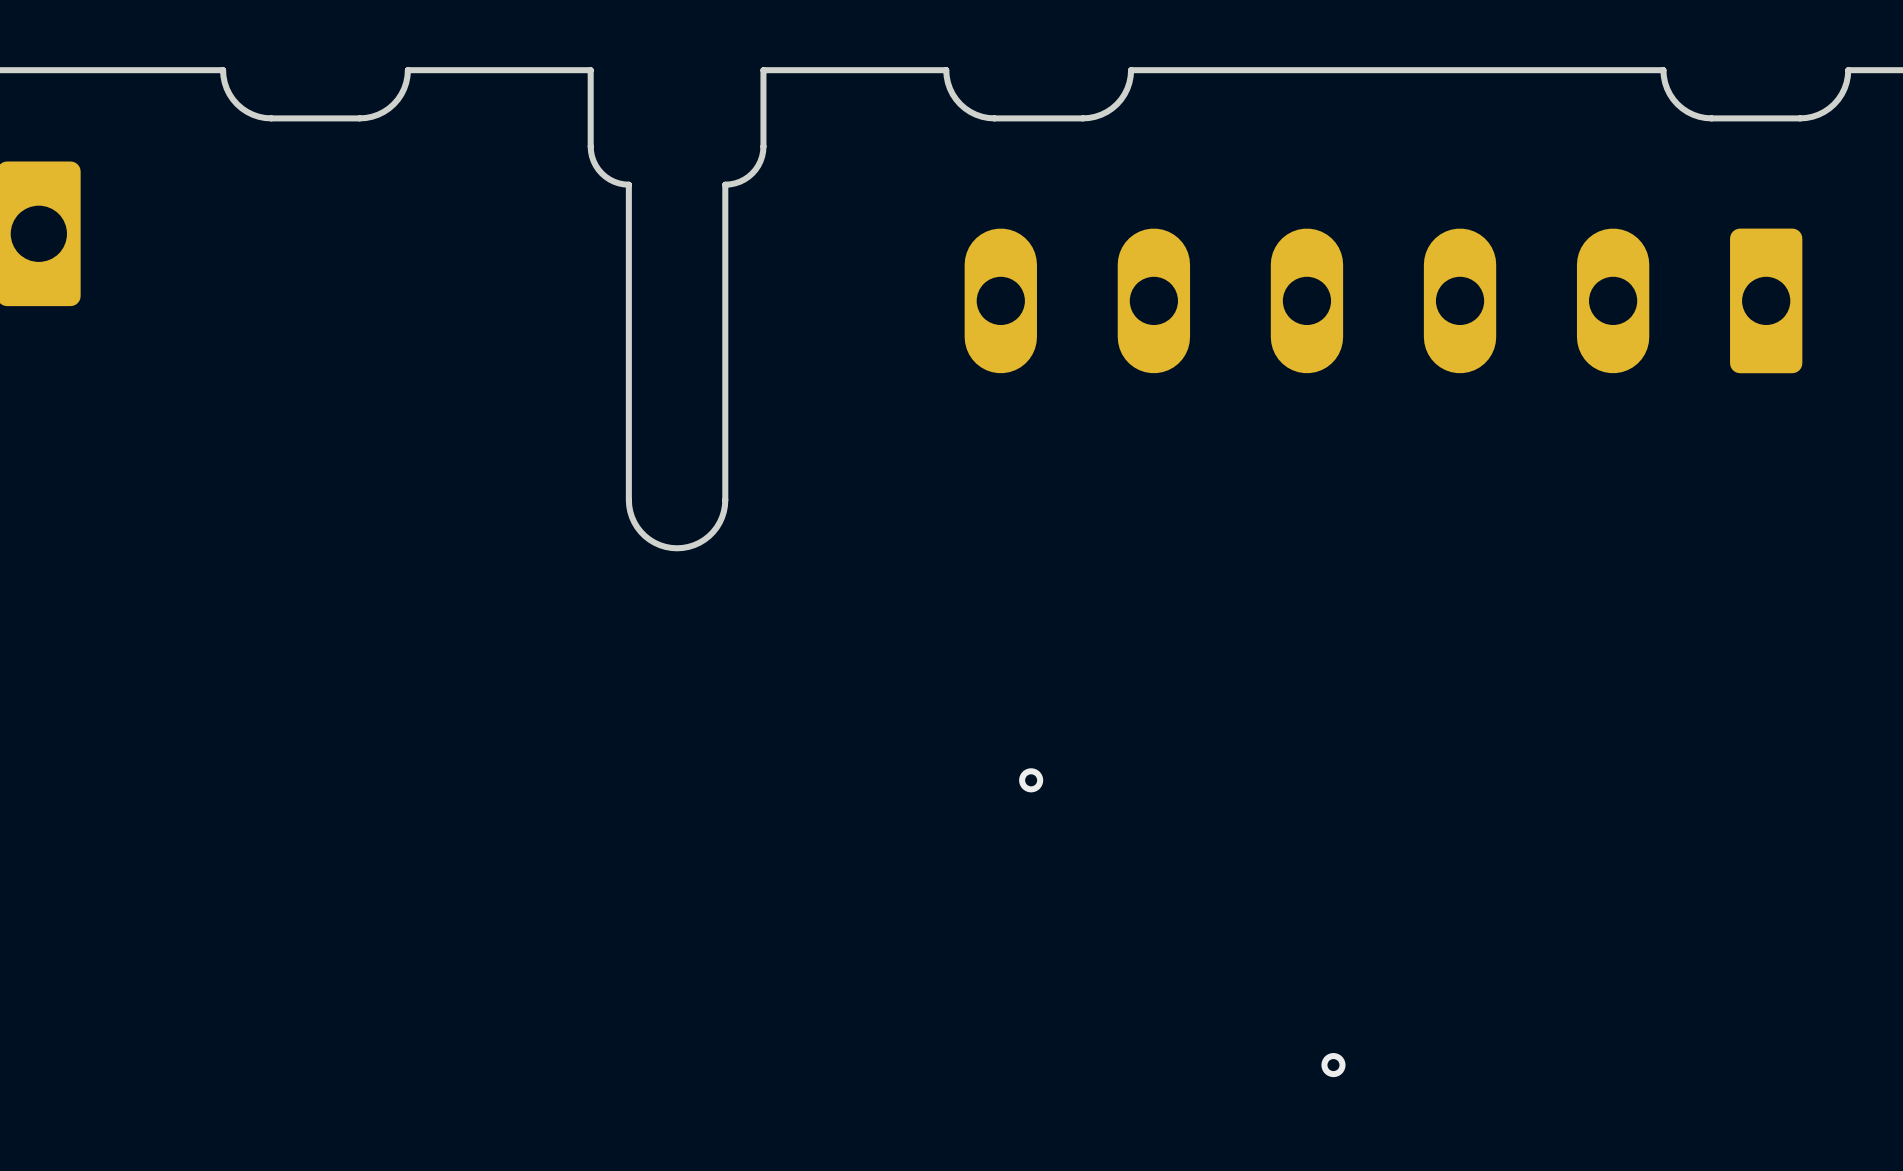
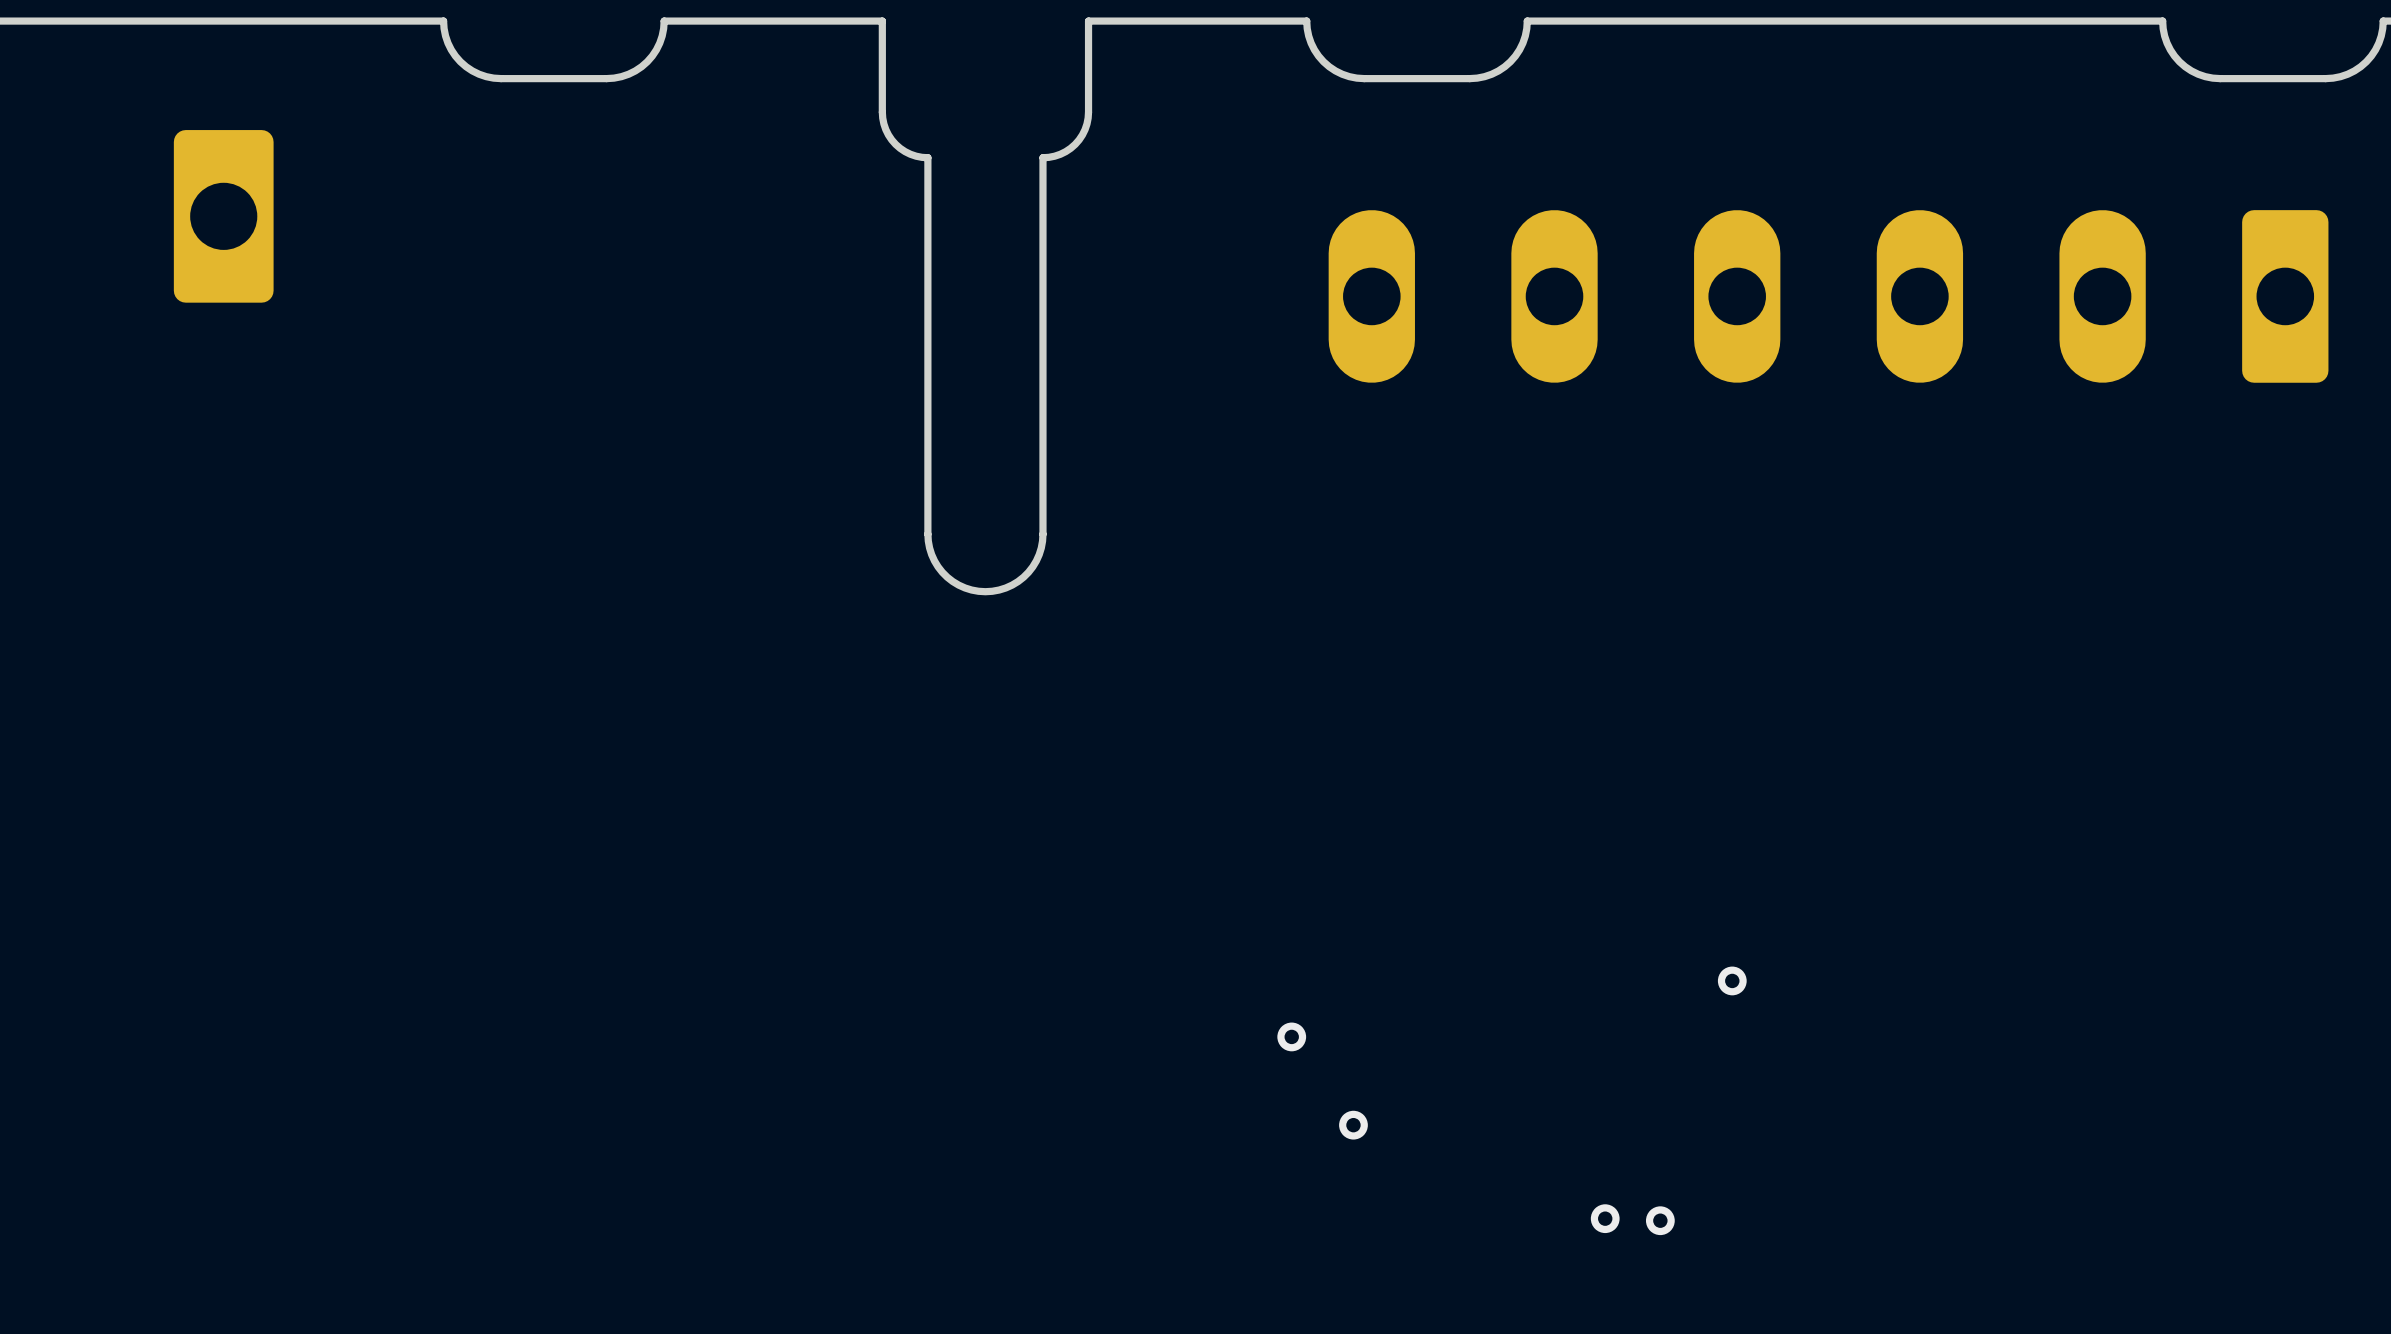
via: (1031, 780) -> none
via: none -> (1732, 980)
via: none -> (1291, 1036)
via: none -> (1353, 1125)
via: (1333, 1065) -> none
via: none -> (1605, 1218)
via: none -> (1660, 1220)

